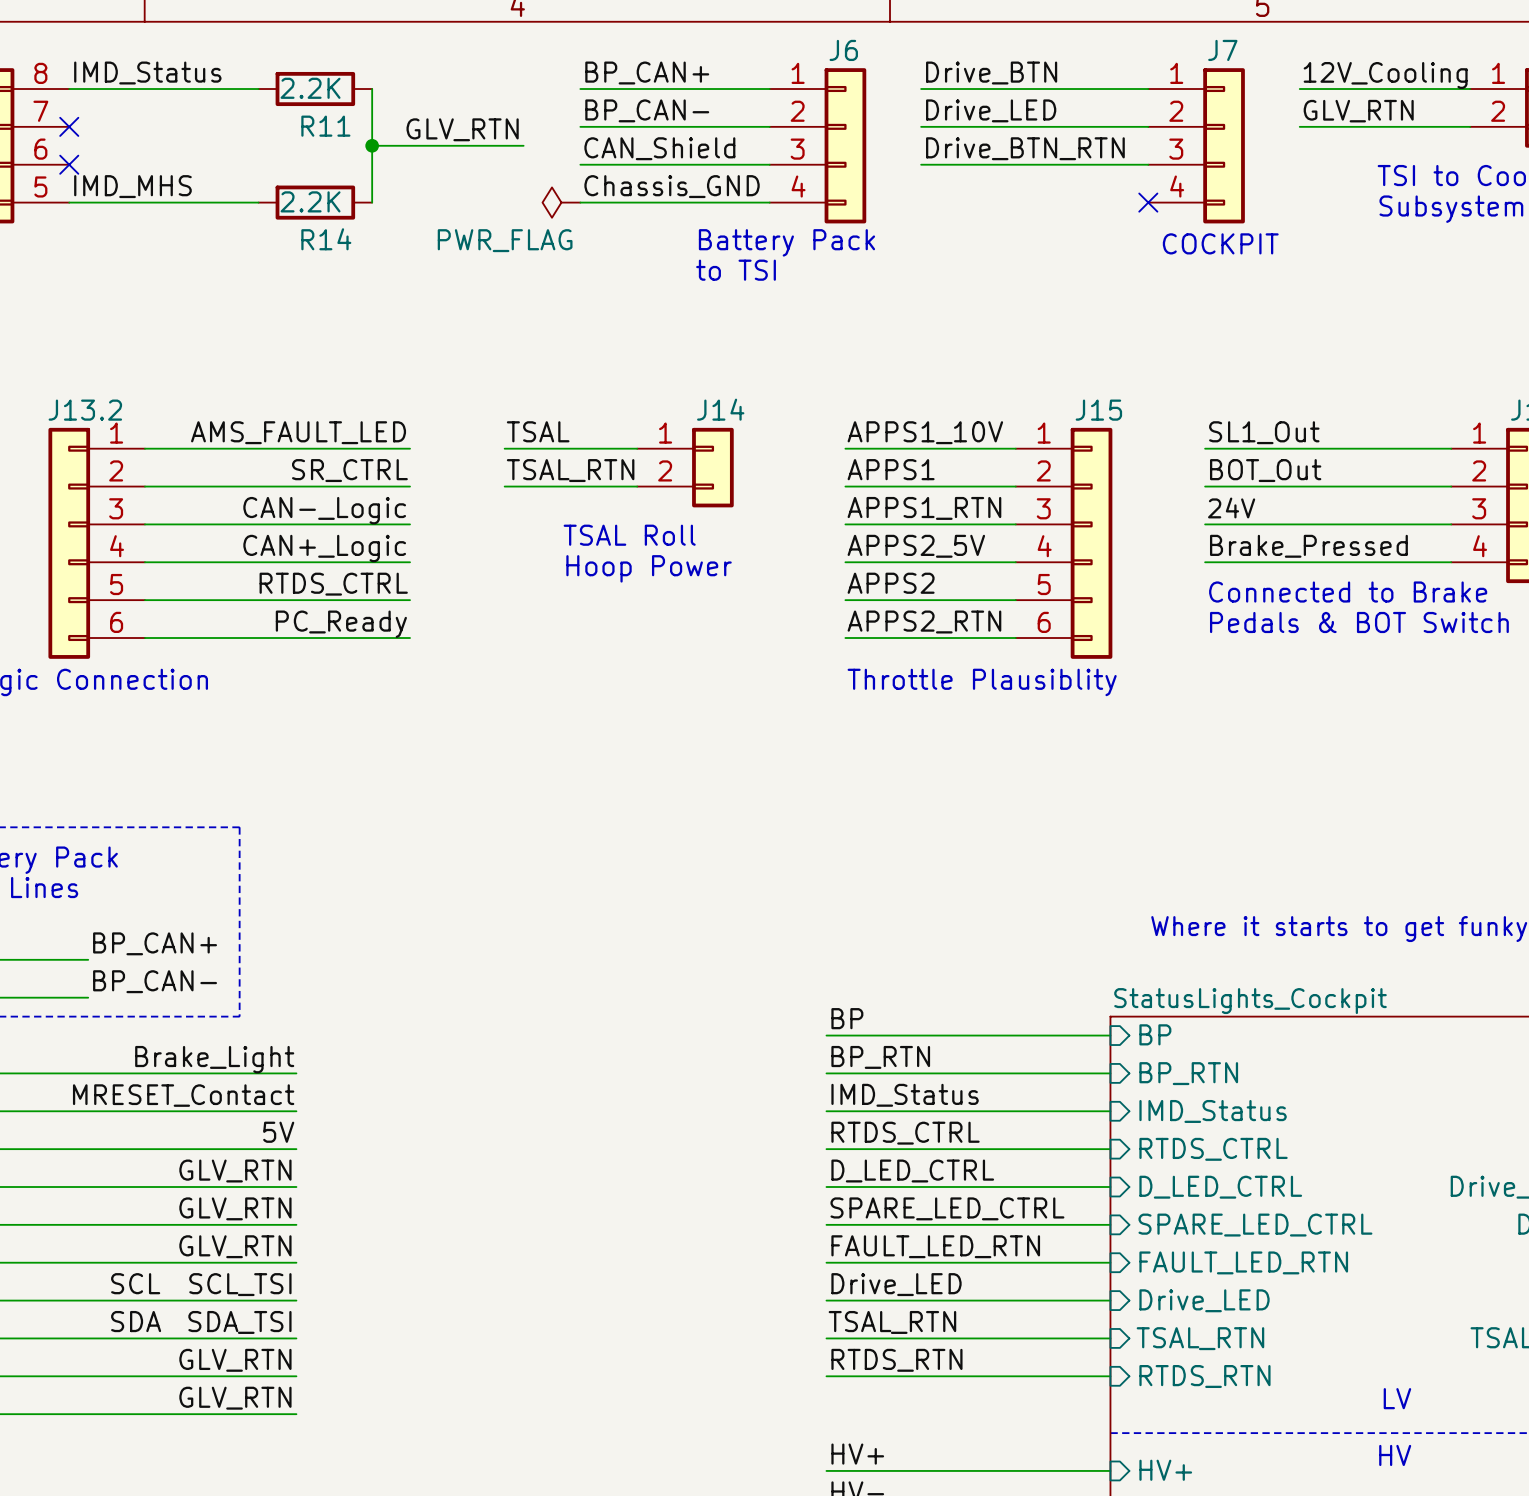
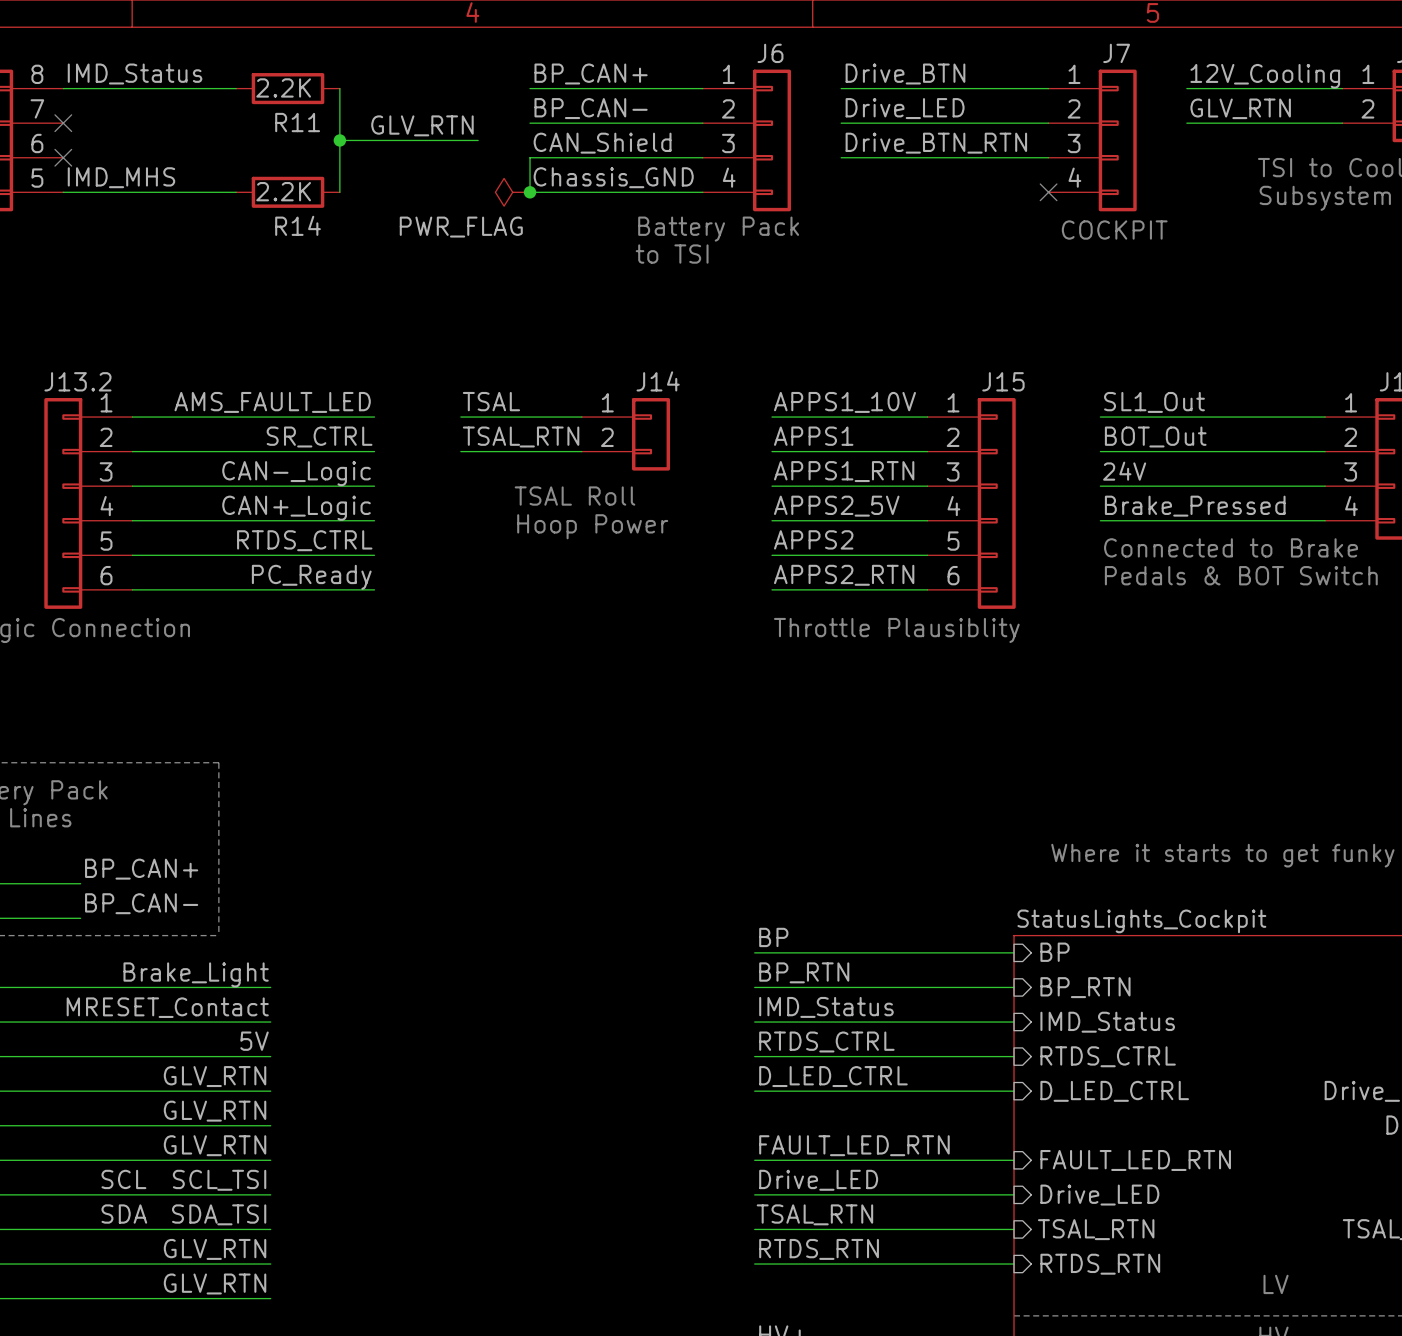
wire: none -> (530, 157) (530, 192)
junction: none -> (530, 192)
label: SPARE_LED_CTRL (947, 1208) -> none
wire: (826, 1224) (1110, 1224) -> none
sheet pin: SPARE_LED_CTRL (1255, 1225) -> none

